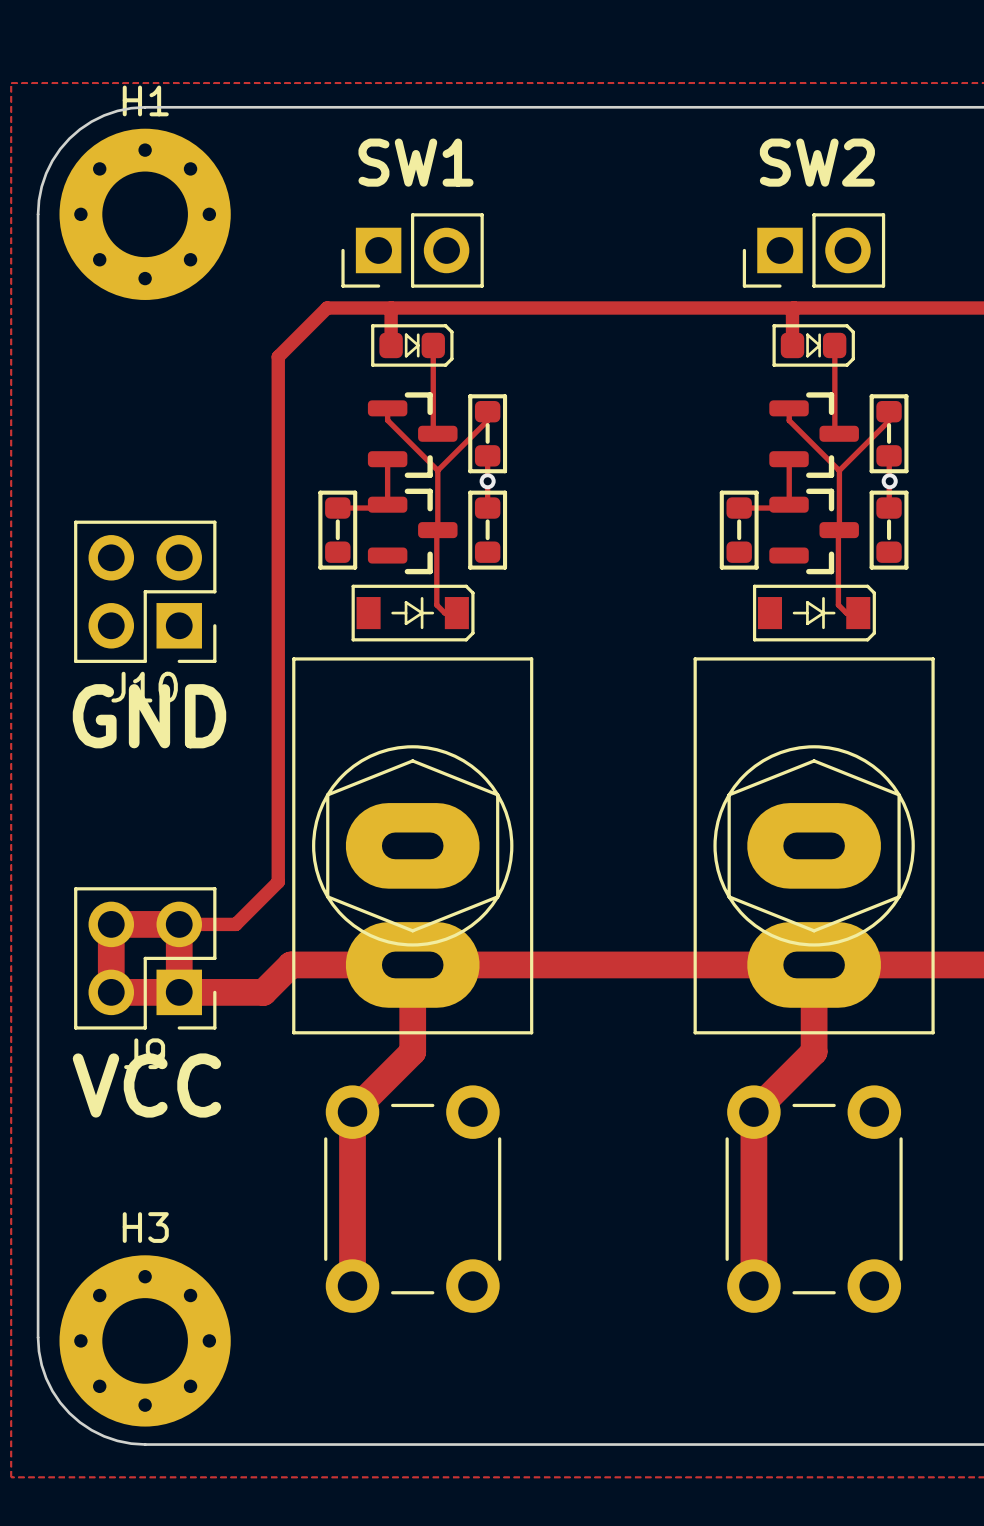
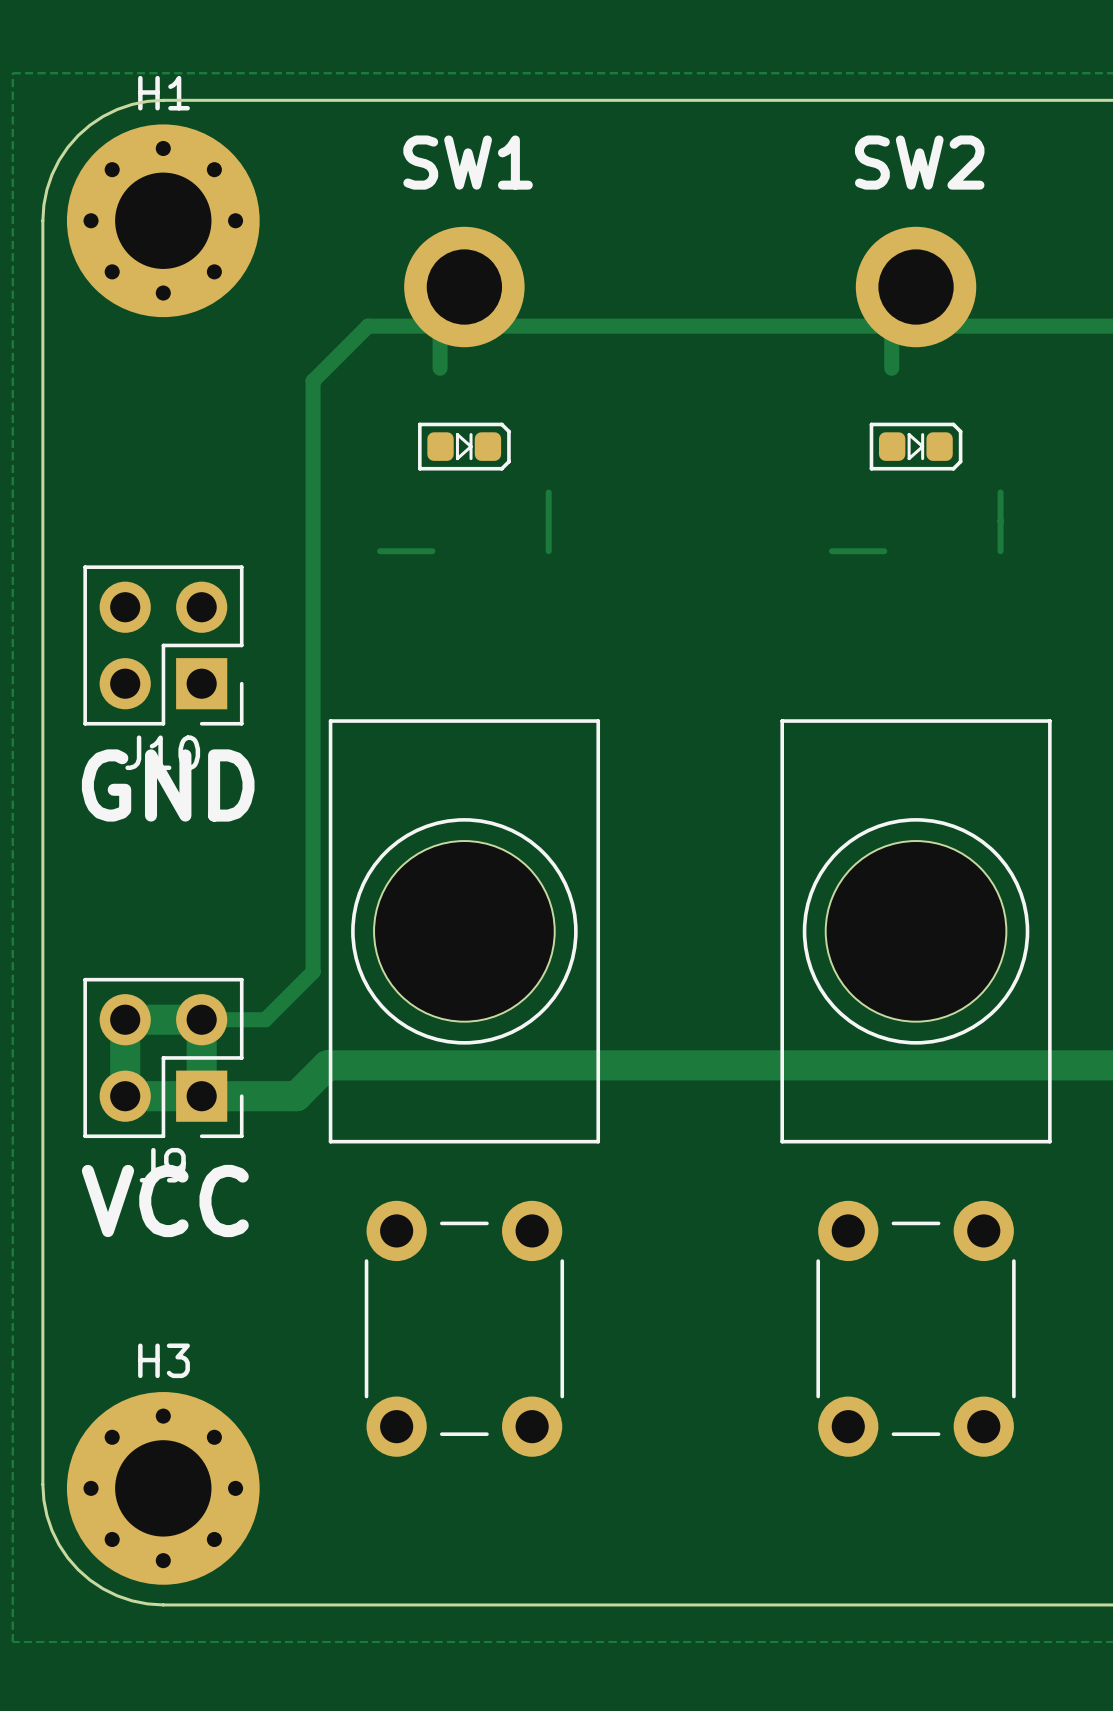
part footprint: [341, 213, 484, 288] -> [404, 226, 525, 348]
part footprint: [742, 213, 886, 288] -> [855, 226, 977, 348]
part: (412, 345) -> none
track: (433, 345) (433, 429) -> none
part: (813, 345) -> none
track: (834, 345) (834, 429) -> none
part footprint: [367, 392, 458, 478] -> [418, 422, 511, 471]
part footprint: [769, 392, 859, 478] -> [869, 422, 963, 471]
track: (387, 408) (387, 420) (437, 470) -> none
track: (789, 408) (789, 420) (839, 470) -> none
track: (487, 411) (487, 420) (437, 470) -> none
track: (889, 411) (889, 420) (839, 470) -> none
part: (487, 433) -> none
part: (889, 433) -> none
track: (387, 459) (387, 504) -> none
track: (789, 459) (789, 504) -> none
track: (437, 470) (437, 530) -> none
track: (839, 470) (839, 530) -> none
via: (487, 481) -> none
via: (889, 481) -> none
part: (337, 530) -> none
part: (487, 530) -> none
part: (739, 530) -> none
part: (889, 530) -> none
part: (412, 531) -> none
track: (436, 531) (436, 605) (444, 613) (456, 613) -> none
part: (814, 531) -> none
track: (838, 531) (838, 605) (846, 613) (858, 613) -> none
part: (413, 613) -> none
part: (814, 613) -> none
part footprint: [292, 657, 534, 1035] -> [328, 719, 601, 1144]
part footprint: [693, 657, 935, 1035] -> [780, 719, 1052, 1144]
track: (412, 964) (412, 1051) (352, 1112) (352, 1286) -> none
track: (814, 964) (814, 1051) (753, 1112) (753, 1286) -> none

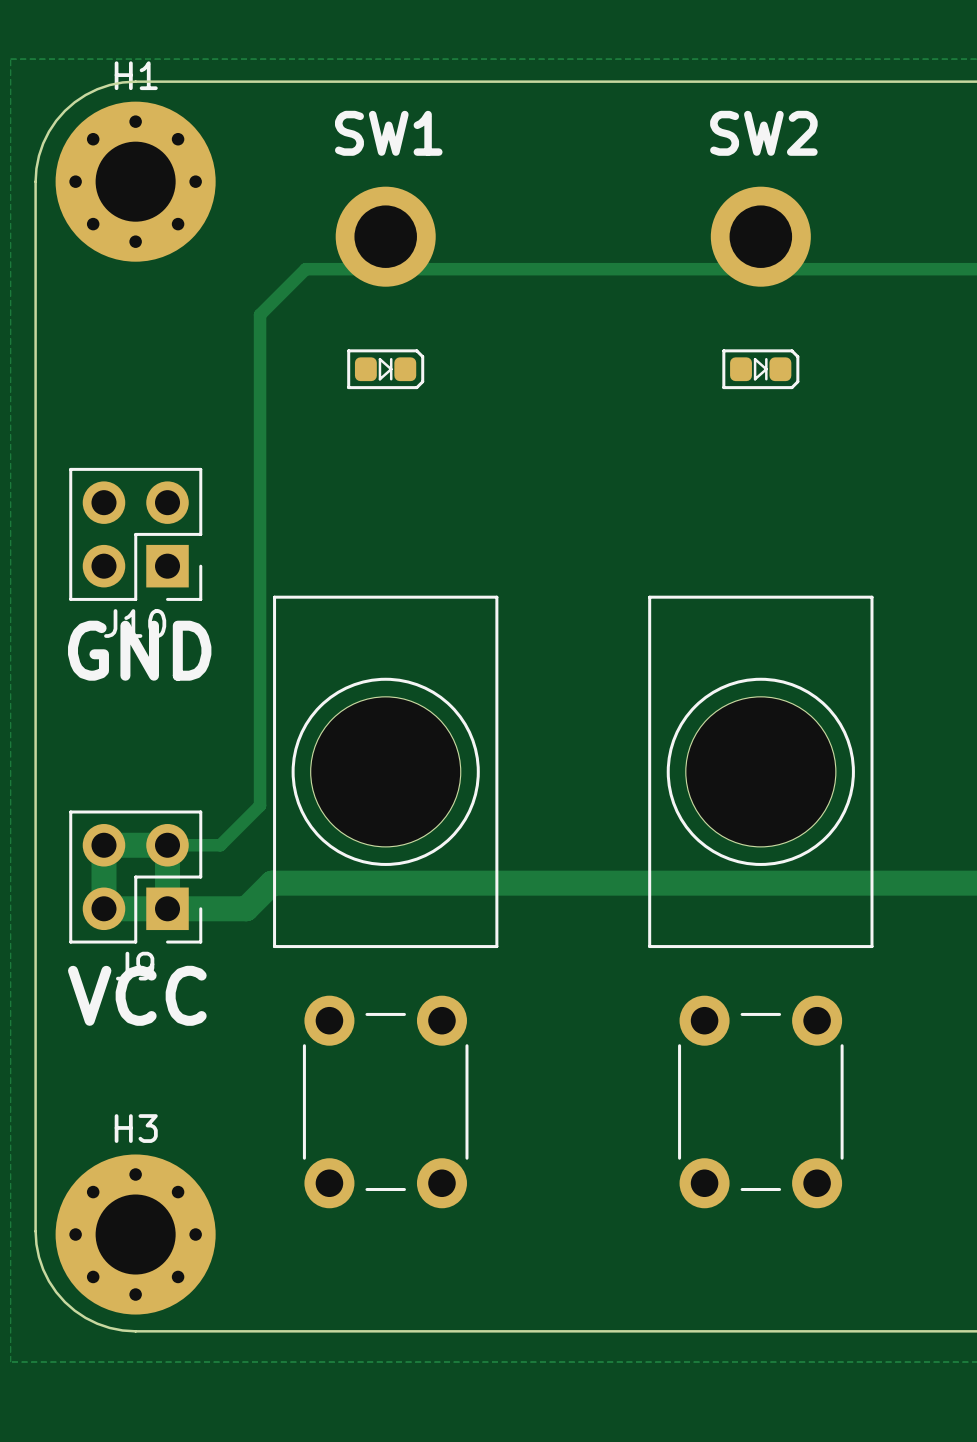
track: (440, 326) (440, 368) -> none
track: (893, 326) (891, 327) (891, 368) -> none
track: (548, 492) (548, 551) -> none
track: (1000, 492) (1000, 551) -> none
track: (380, 551) (432, 551) -> none
track: (831, 551) (884, 551) -> none

